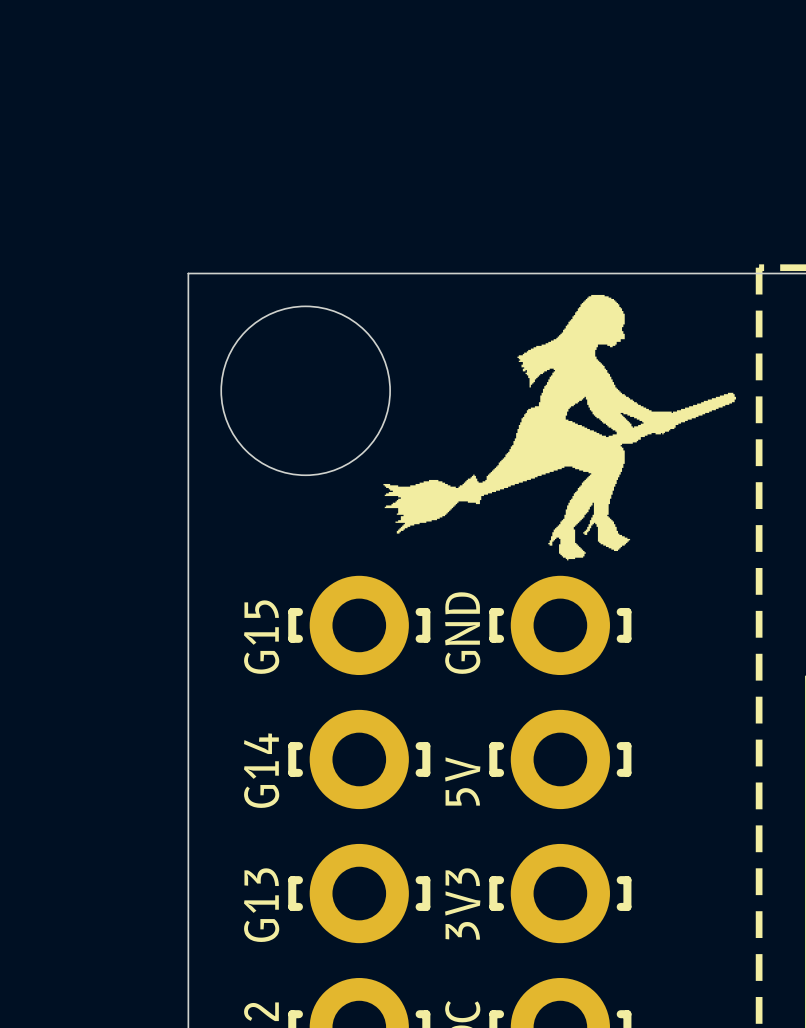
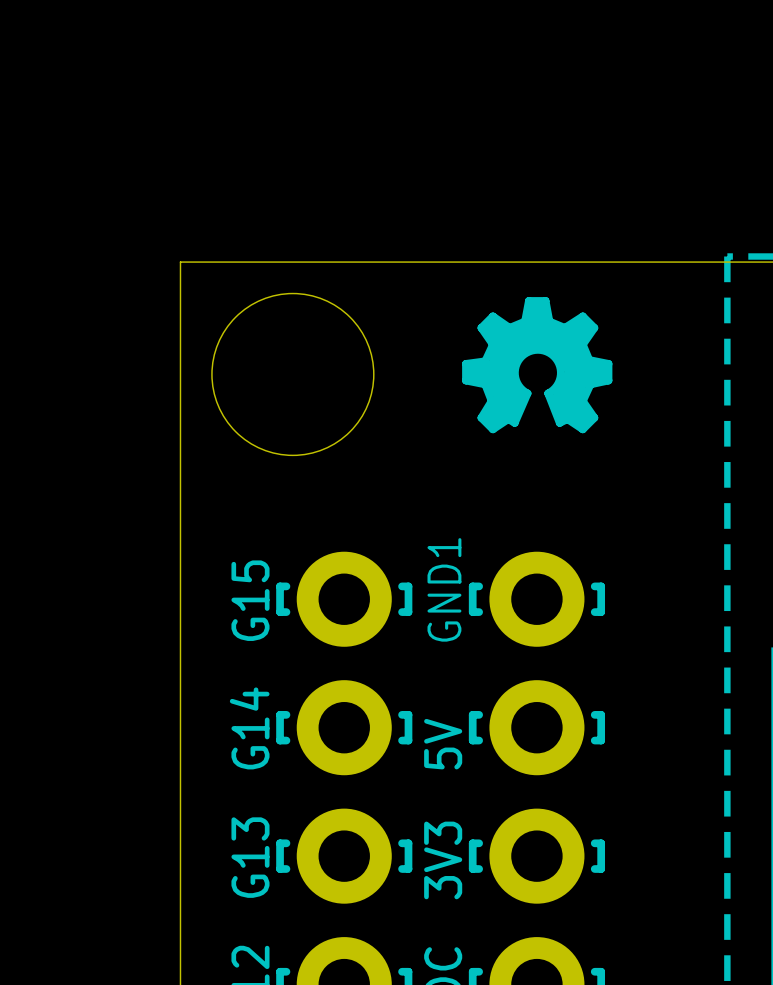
drawing: [383, 294, 737, 561] -> none
drawing: none -> [462, 297, 613, 434]
GND1 name: none -> GND1 (444, 589)
text: GND (462, 633) -> none

